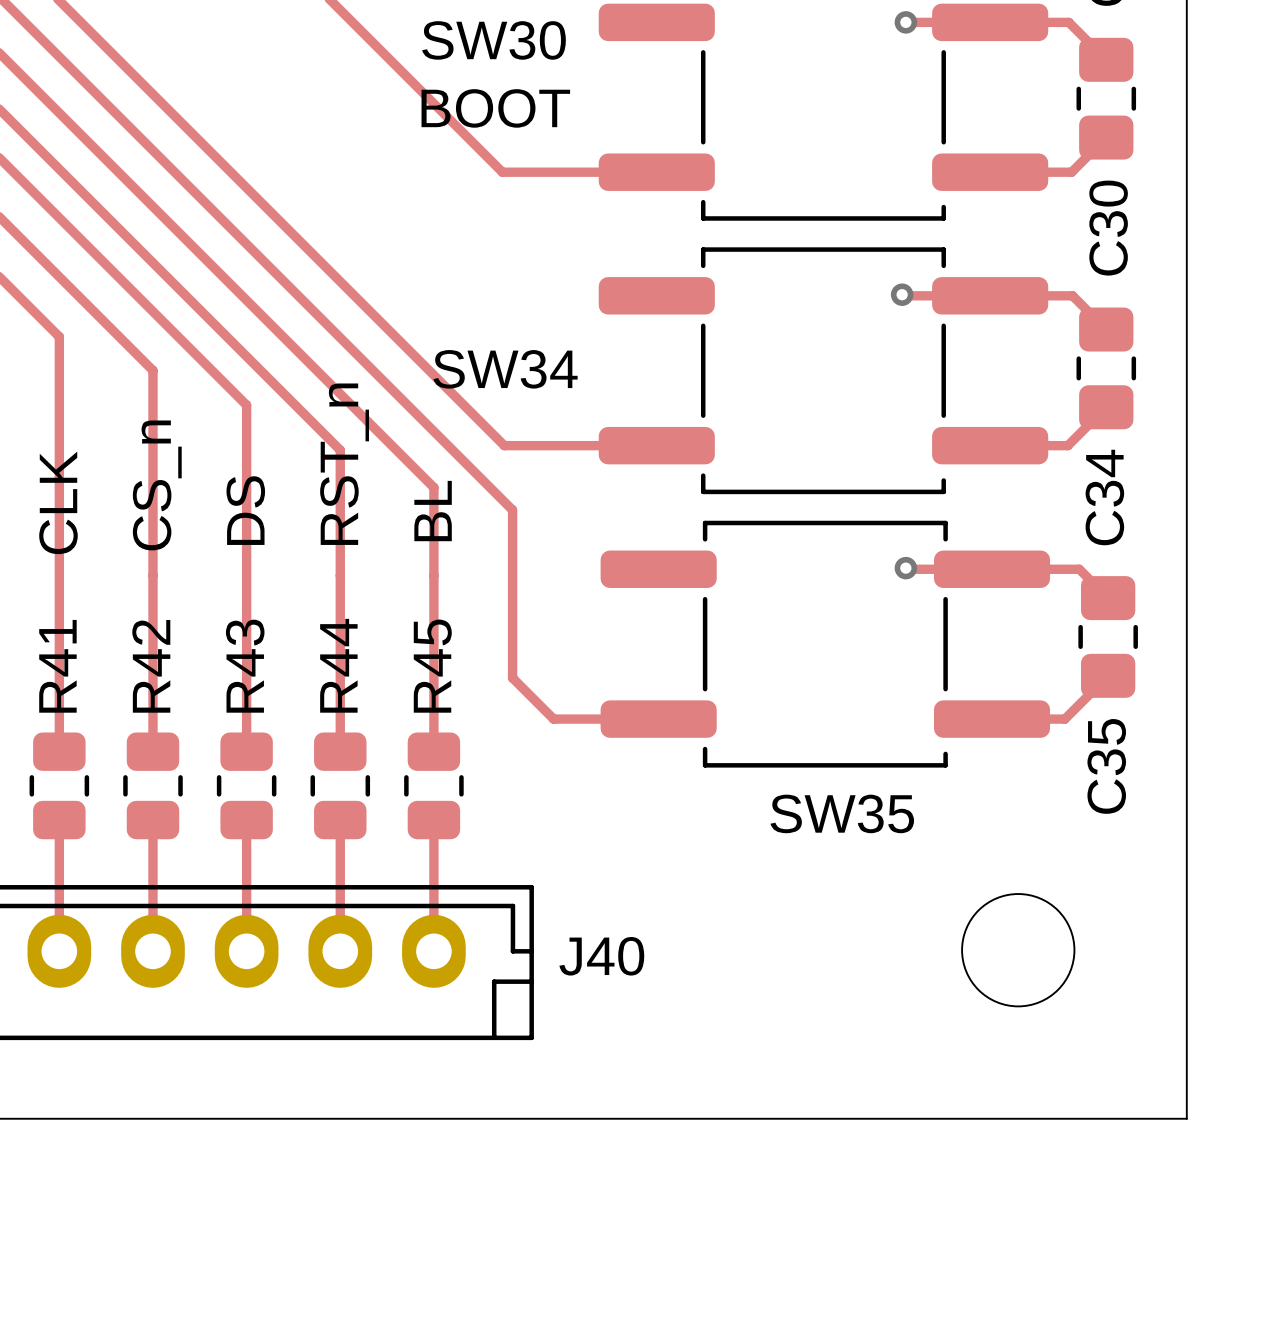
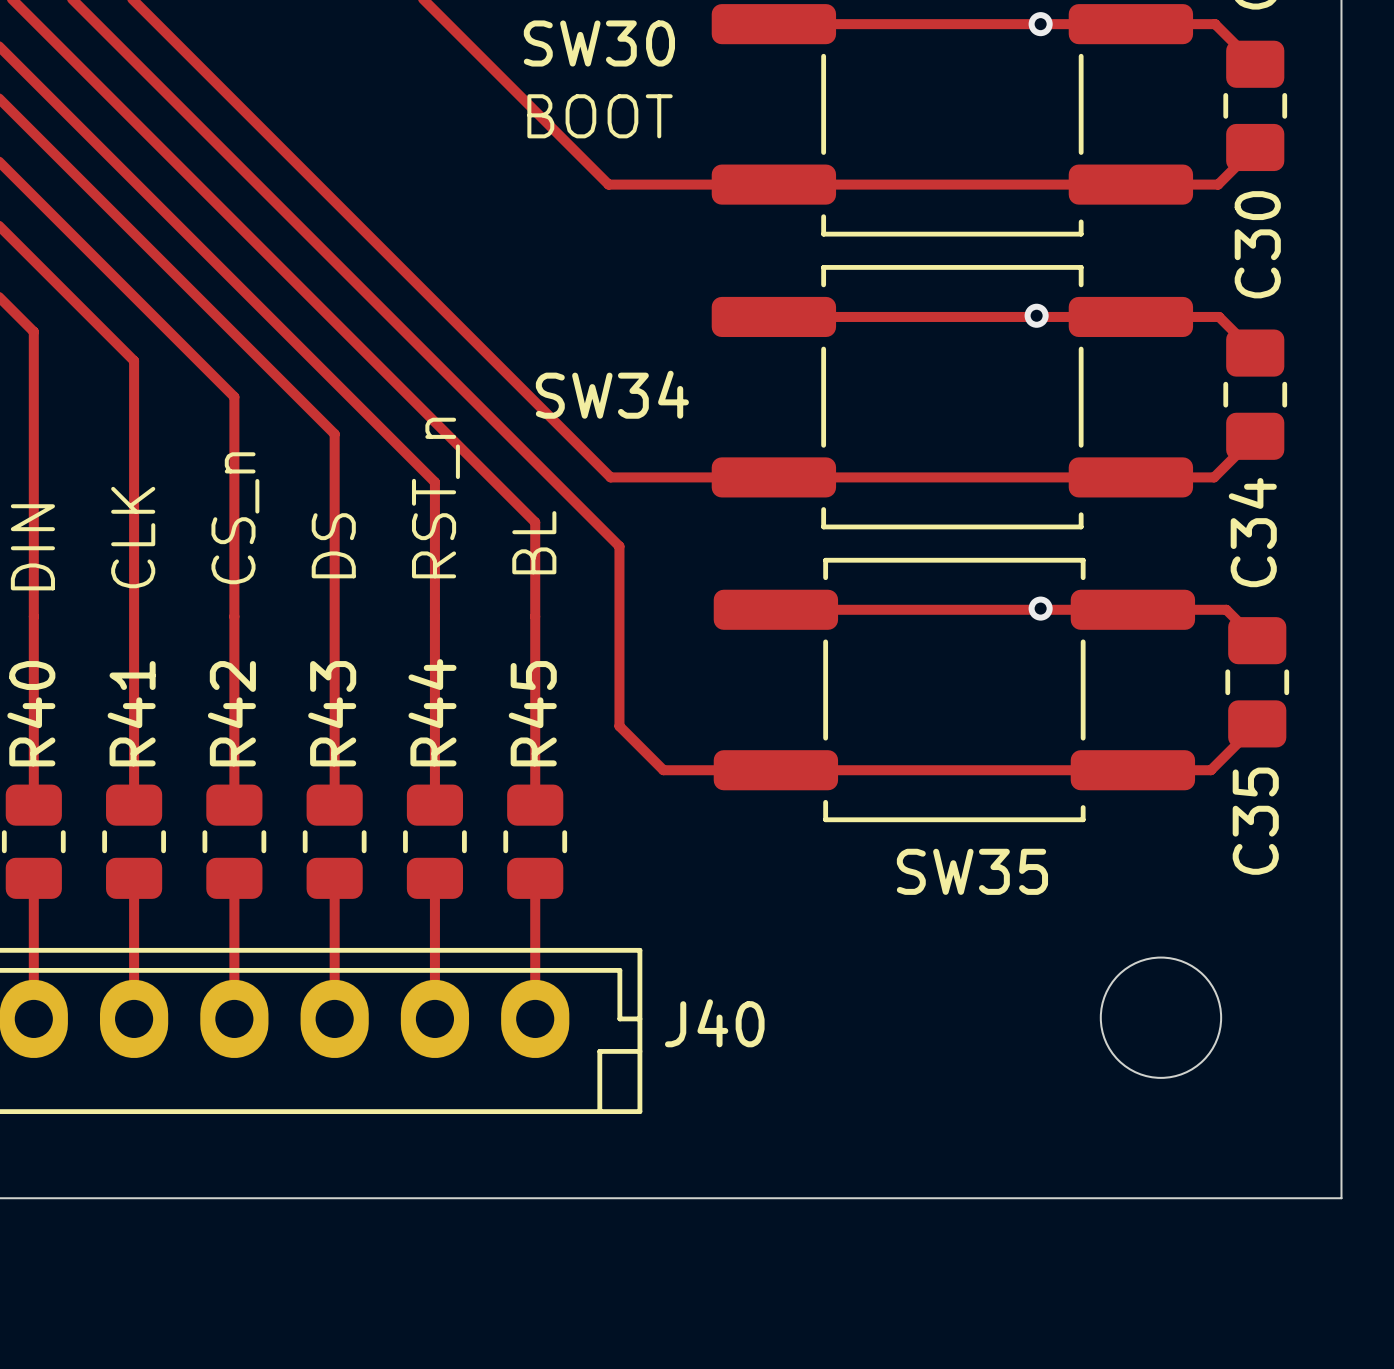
track: none -> (773, 24) (1040, 24)
track: none -> (773, 184) (1130, 184)
track: none -> (1036, 315) (773, 316)
track: none -> (773, 477) (1130, 477)
track: none -> (1040, 608) (775, 609)
track: none -> (775, 770) (1132, 770)

